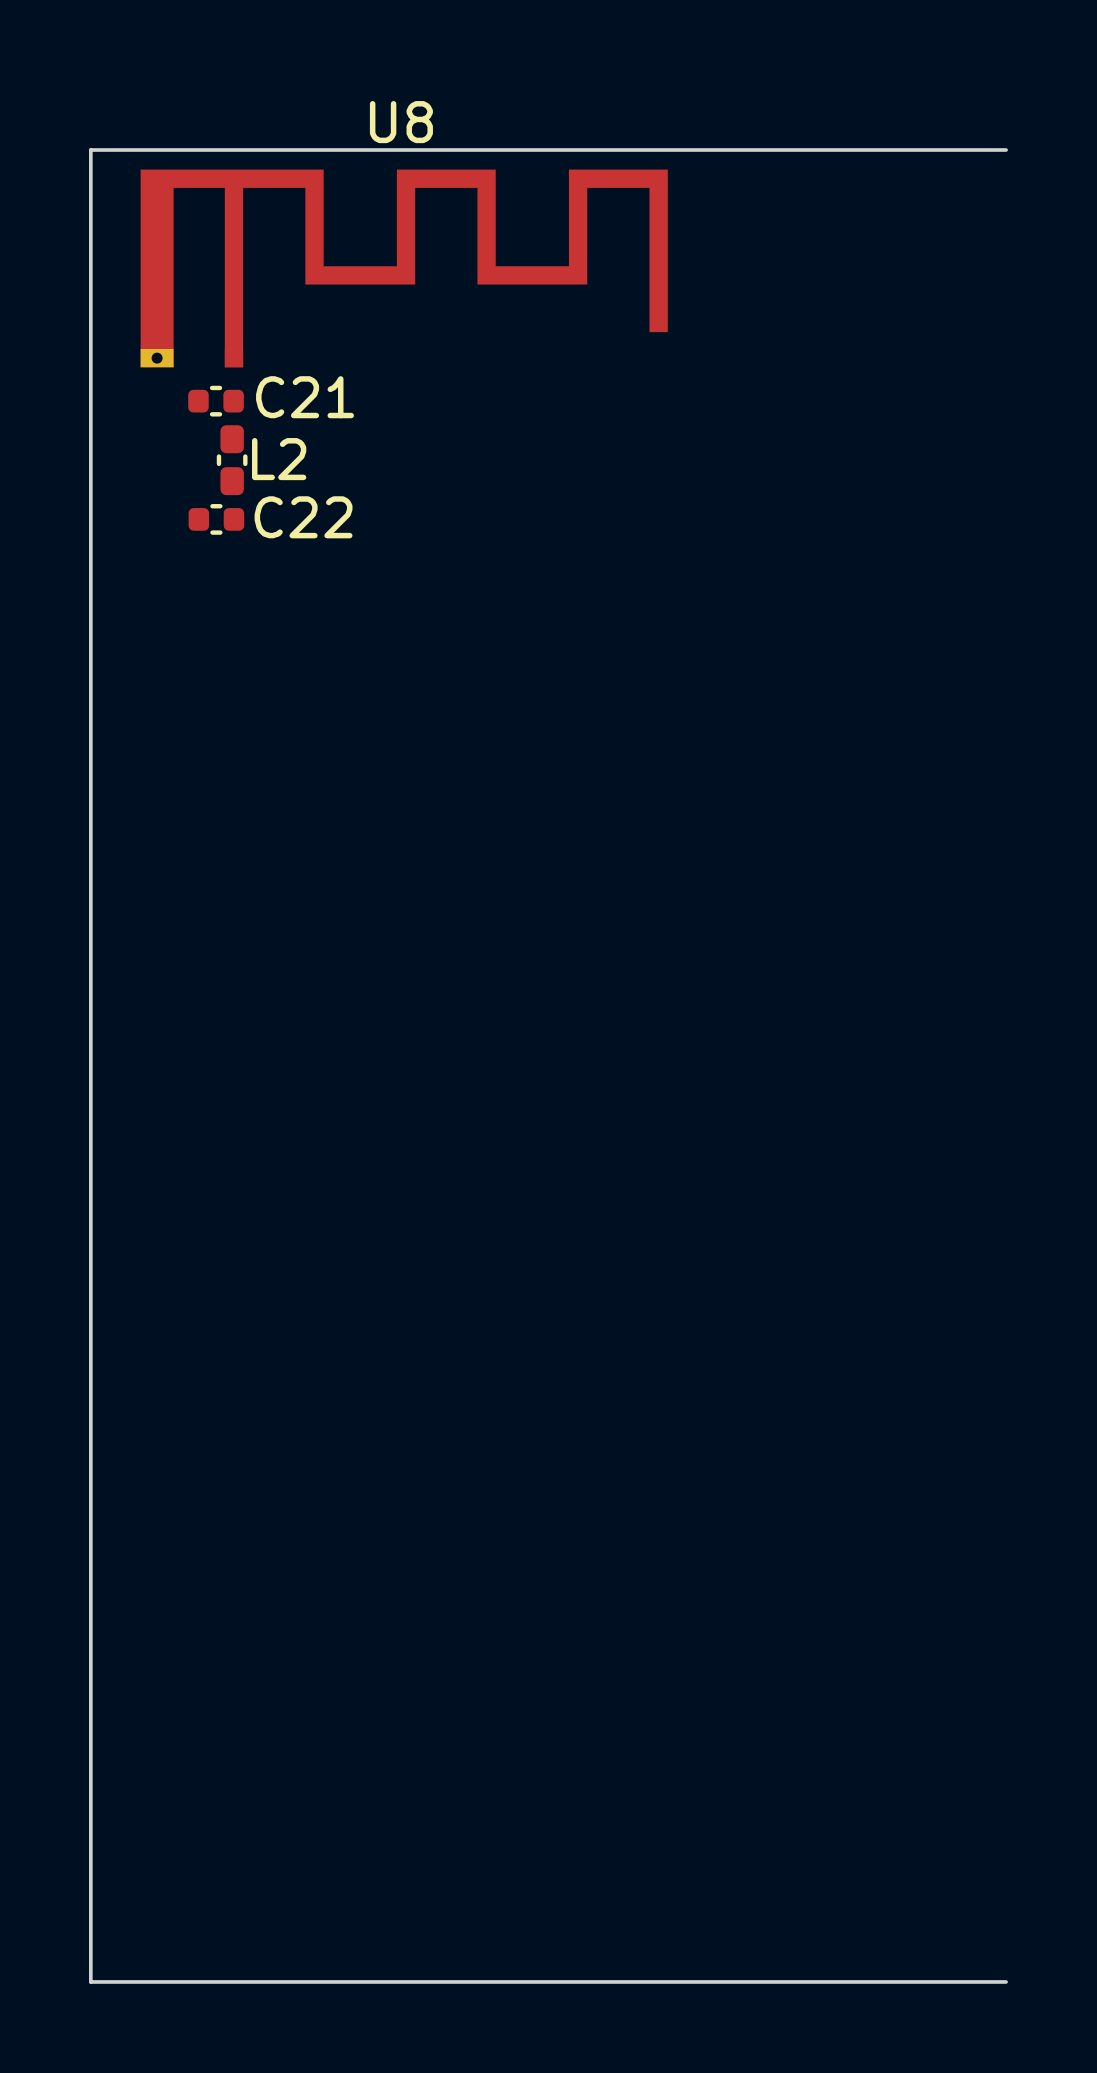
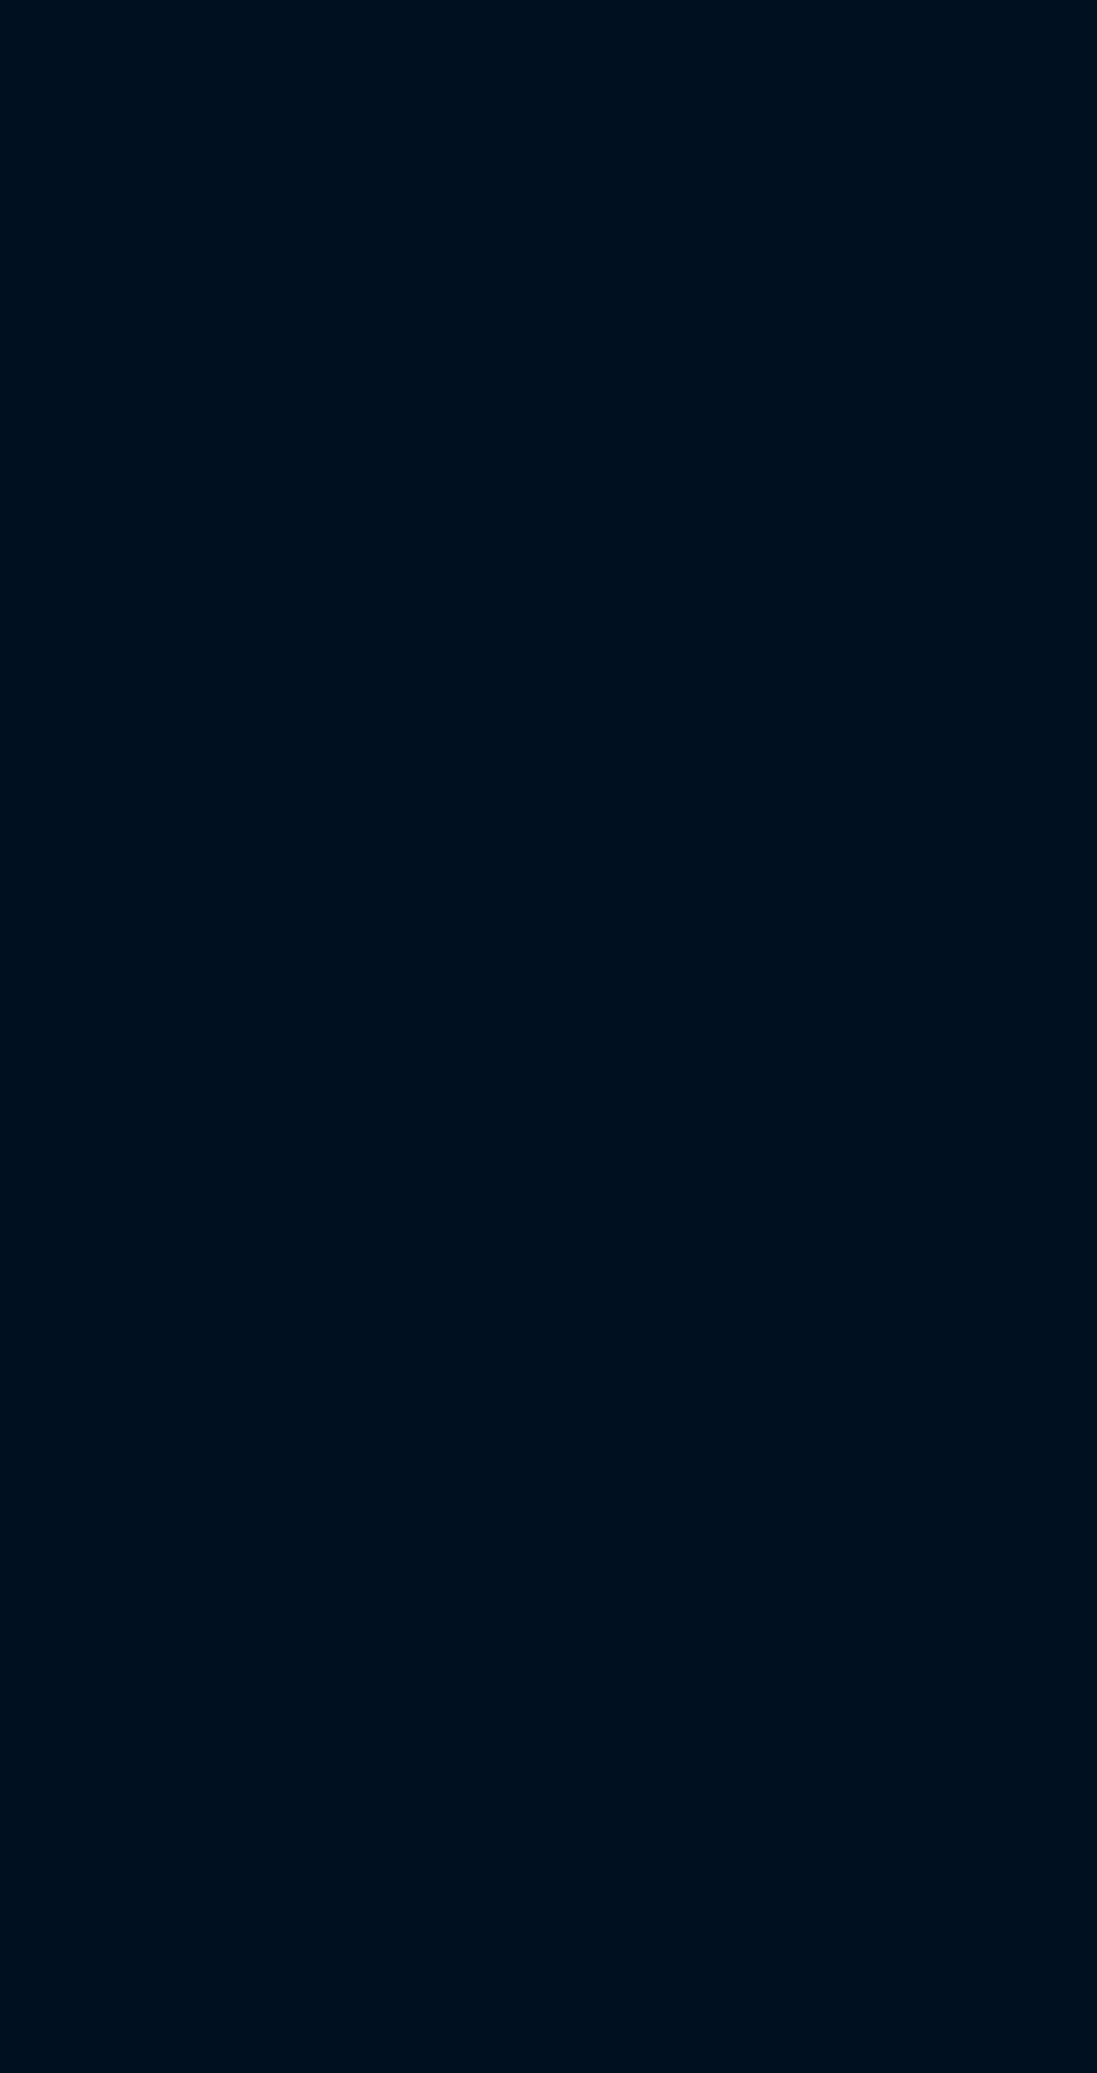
board edge: (1006, 150) (90, 150) (90, 1981) (1006, 1981) -> none
U8: (404, 268) -> none
C21: (216, 401) -> none
L2: (232, 460) -> none
C22: (216, 519) -> none

